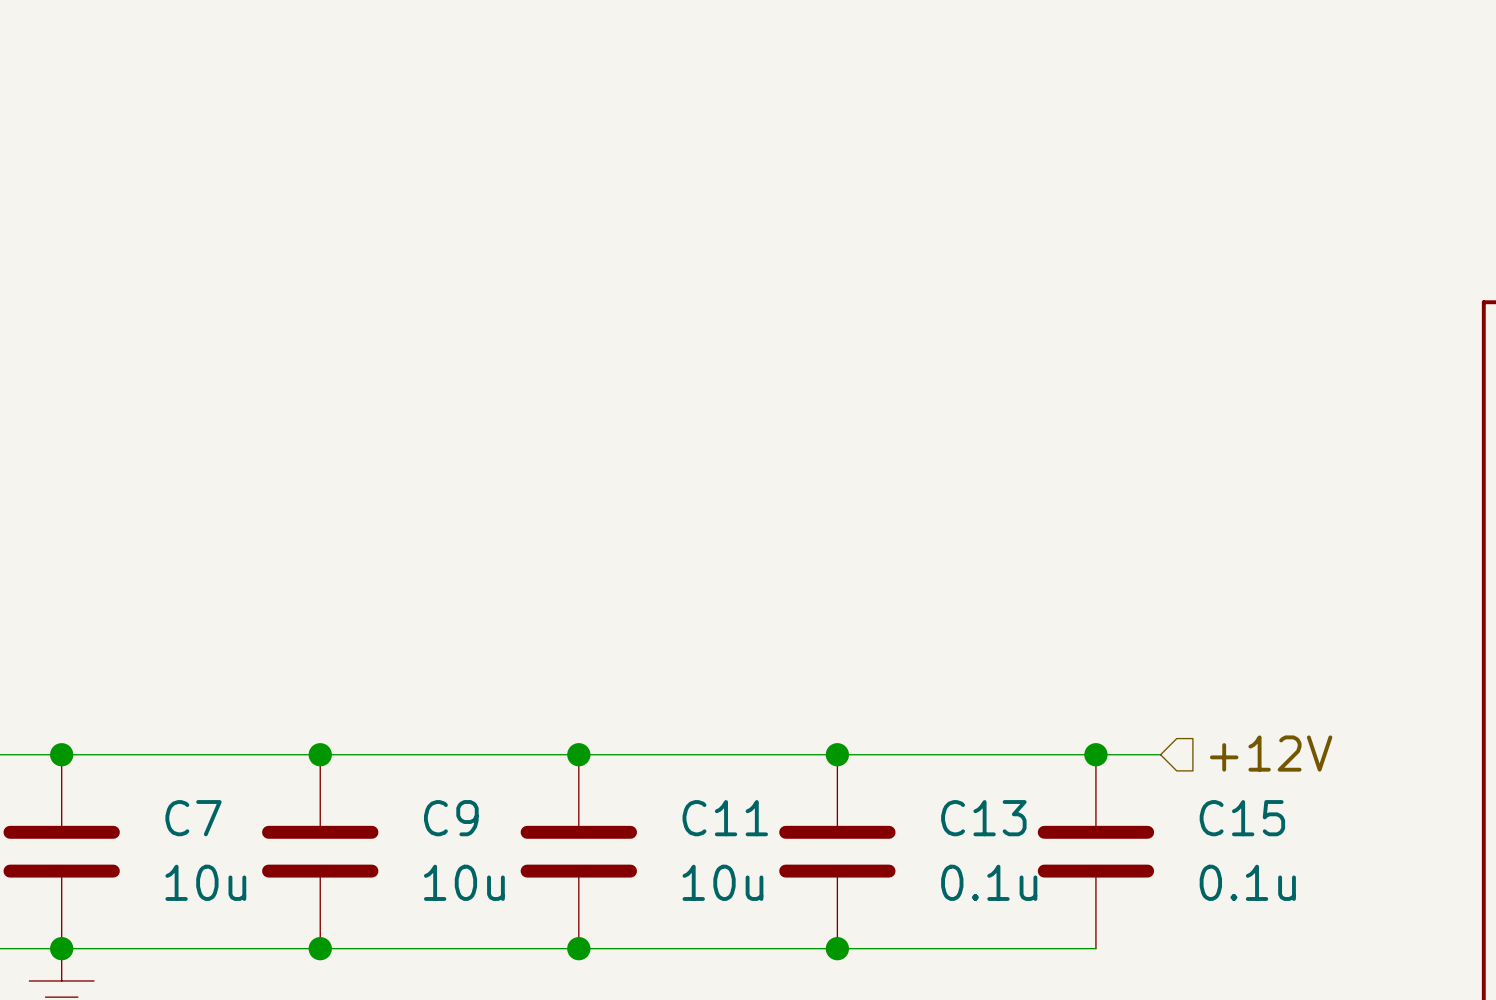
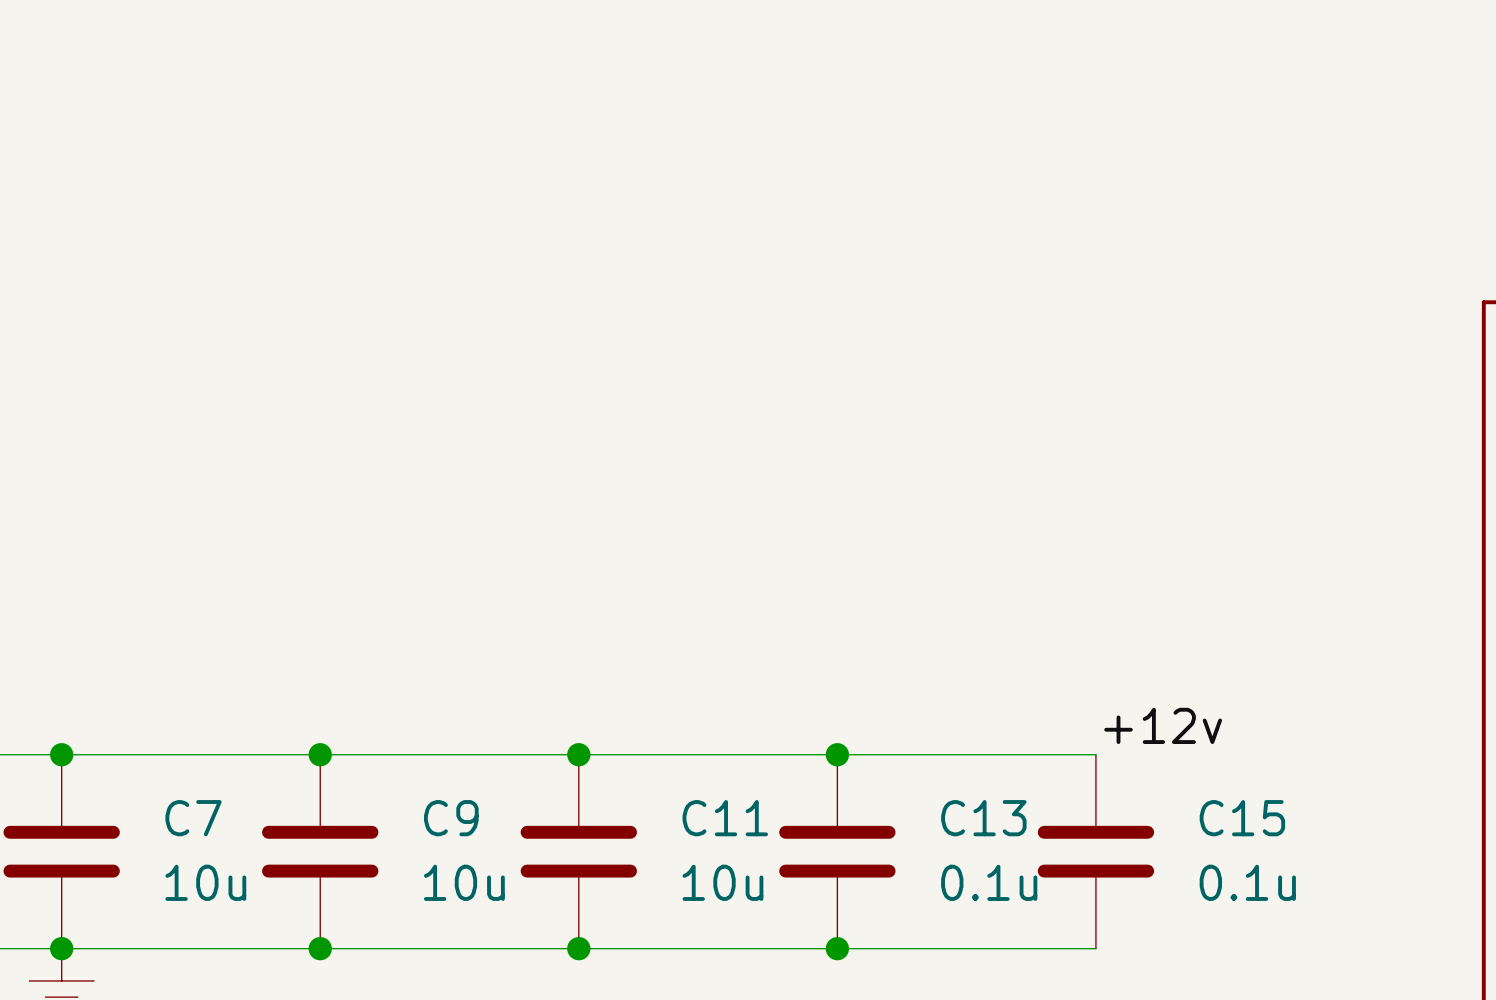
label: none -> +12v (1163, 725)
hierarchical label: +12V (1271, 753) -> none
wire: (1095, 754) (1160, 754) -> none
junction: (1095, 754) -> none

